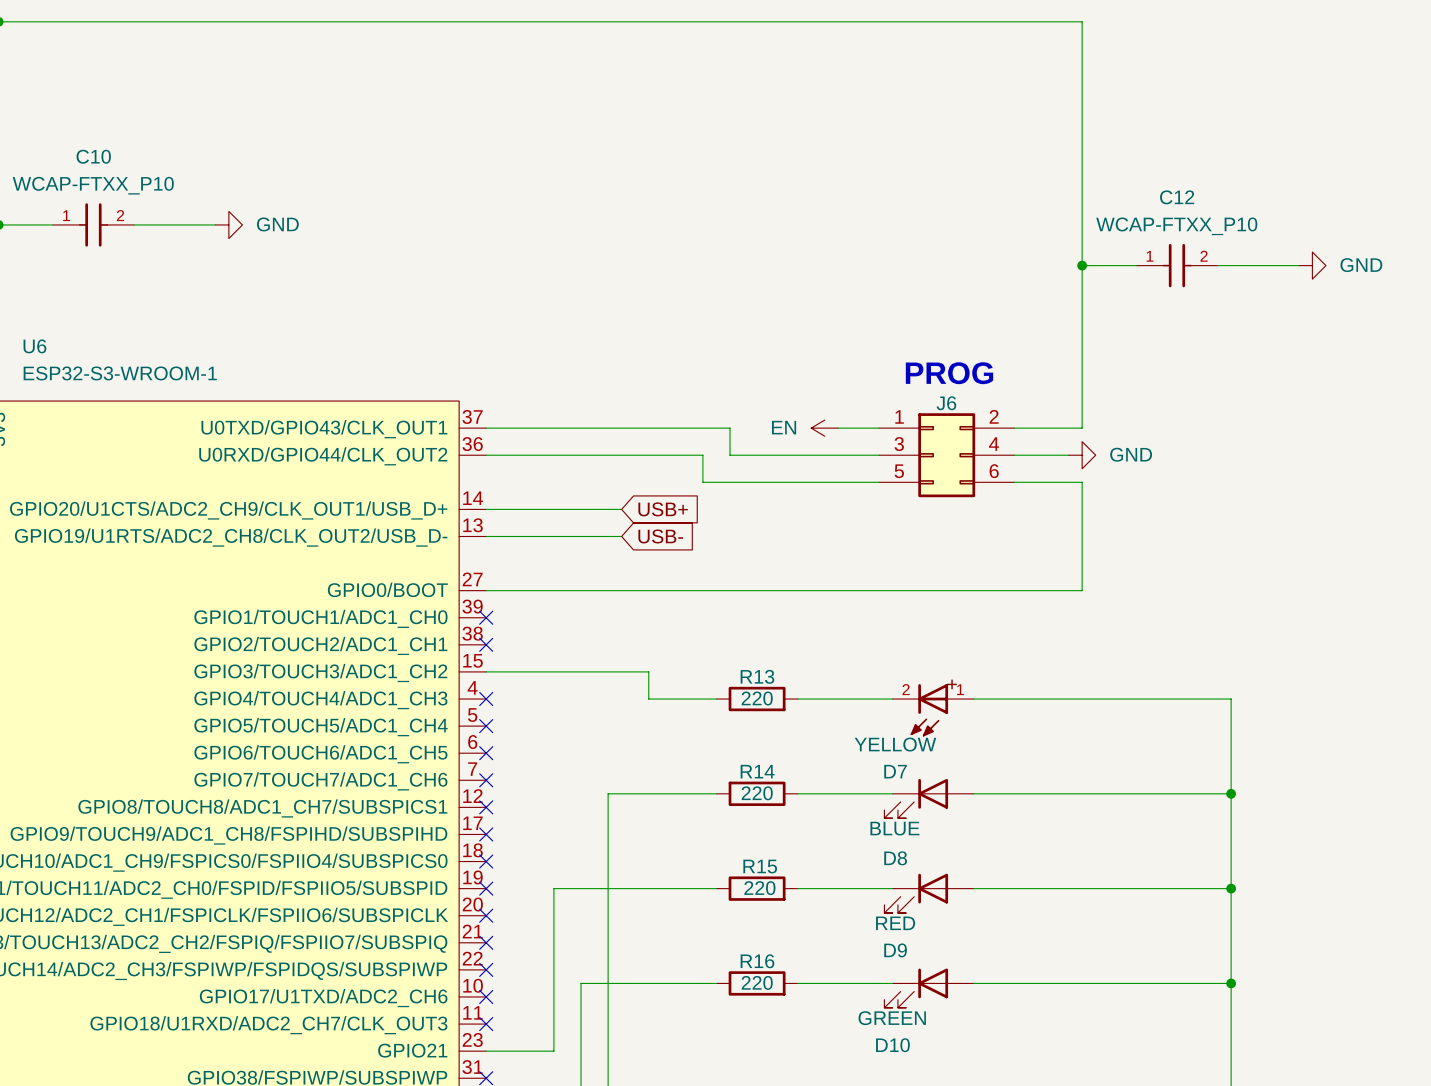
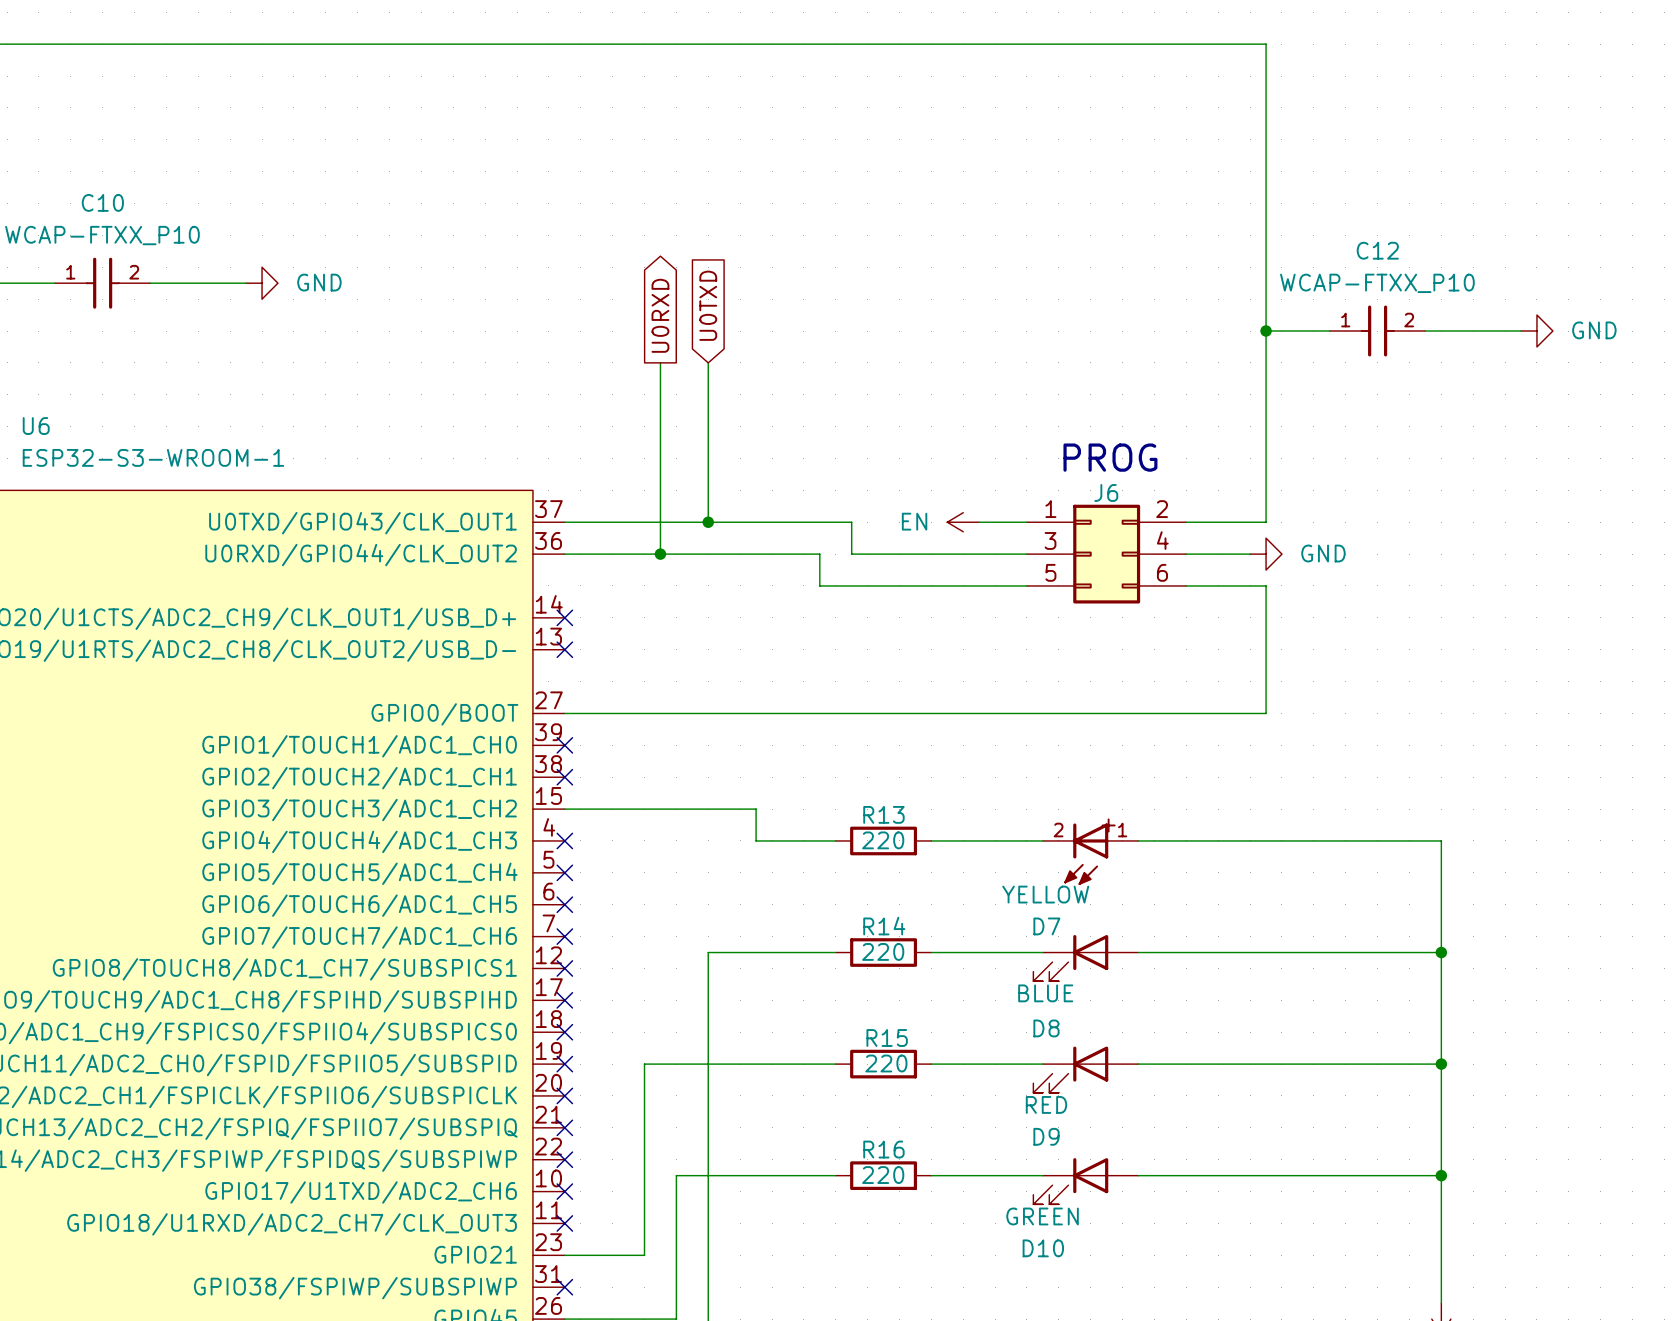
global label: none -> U0TXD (708, 305)
global label: none -> U0RXD (660, 315)
wire: none -> (660, 362) (660, 554)
wire: none -> (708, 362) (708, 522)
junction: none -> (708, 522)
junction: none -> (660, 554)
wire: (486, 509) (621, 509) -> none
no-connect mark: none -> (564, 617)
global label: USB+ (663, 509) -> none
wire: (486, 536) (621, 536) -> none
no-connect mark: none -> (564, 649)
global label: USB- (660, 536) -> none

